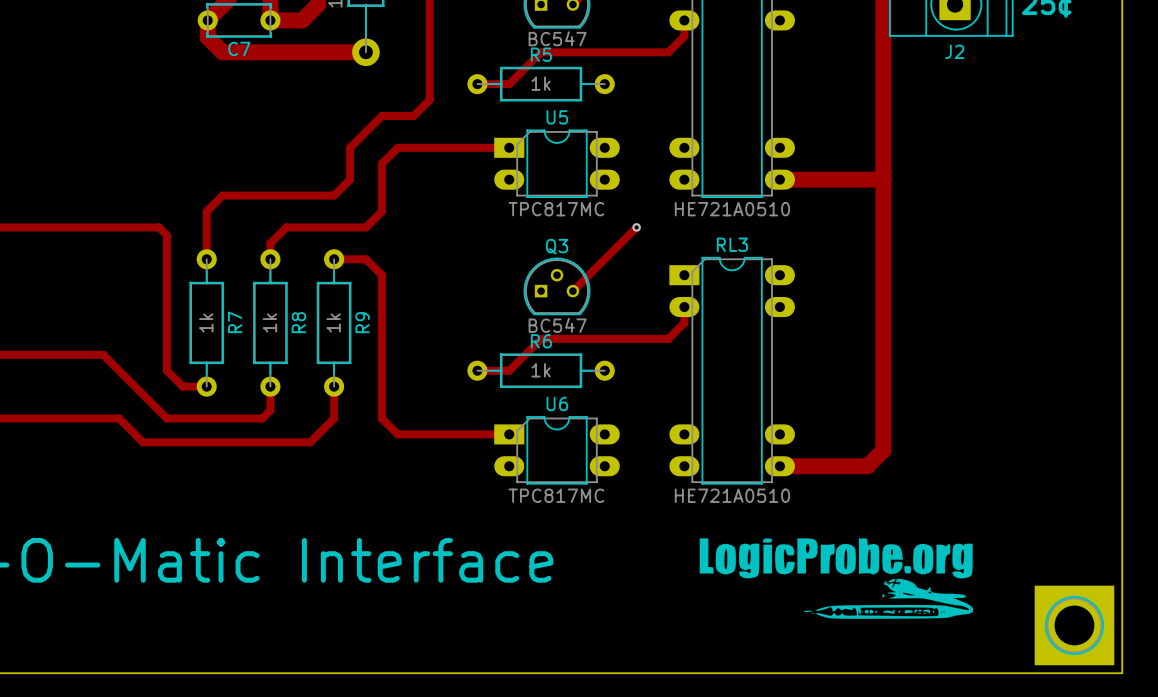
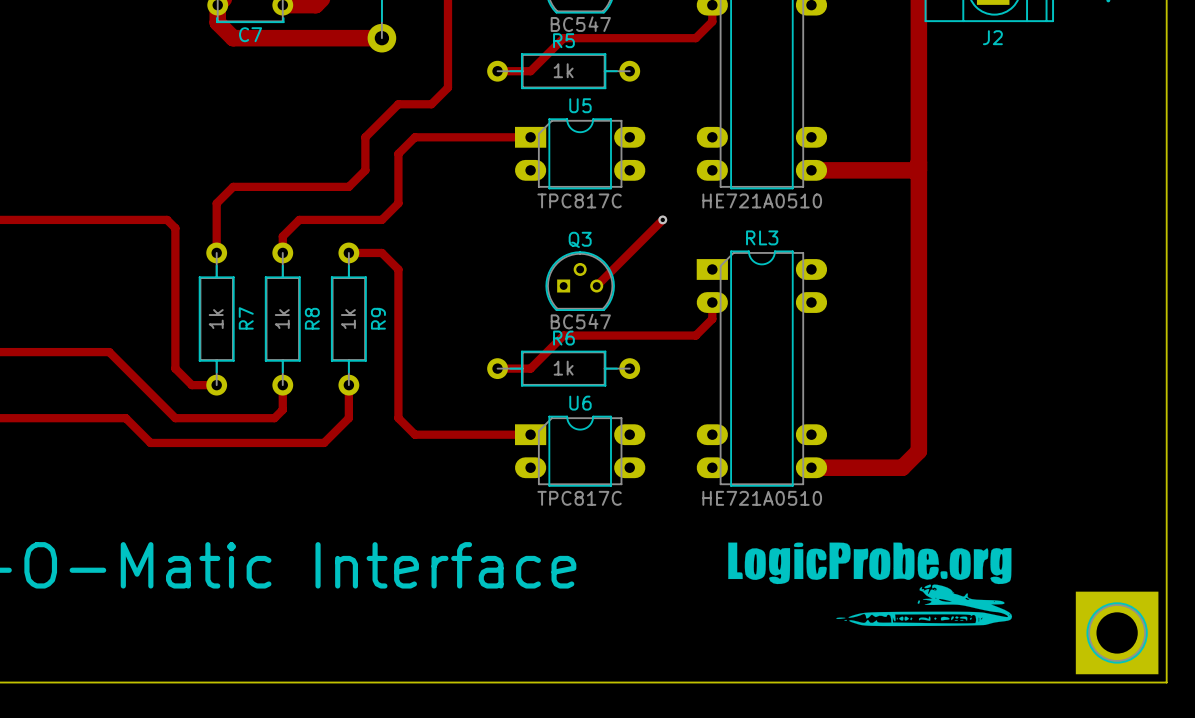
U5 value: TPC817MC (556, 209) -> TPC817C (579, 200)
U6 value: TPC817MC (556, 495) -> TPC817C (579, 498)

